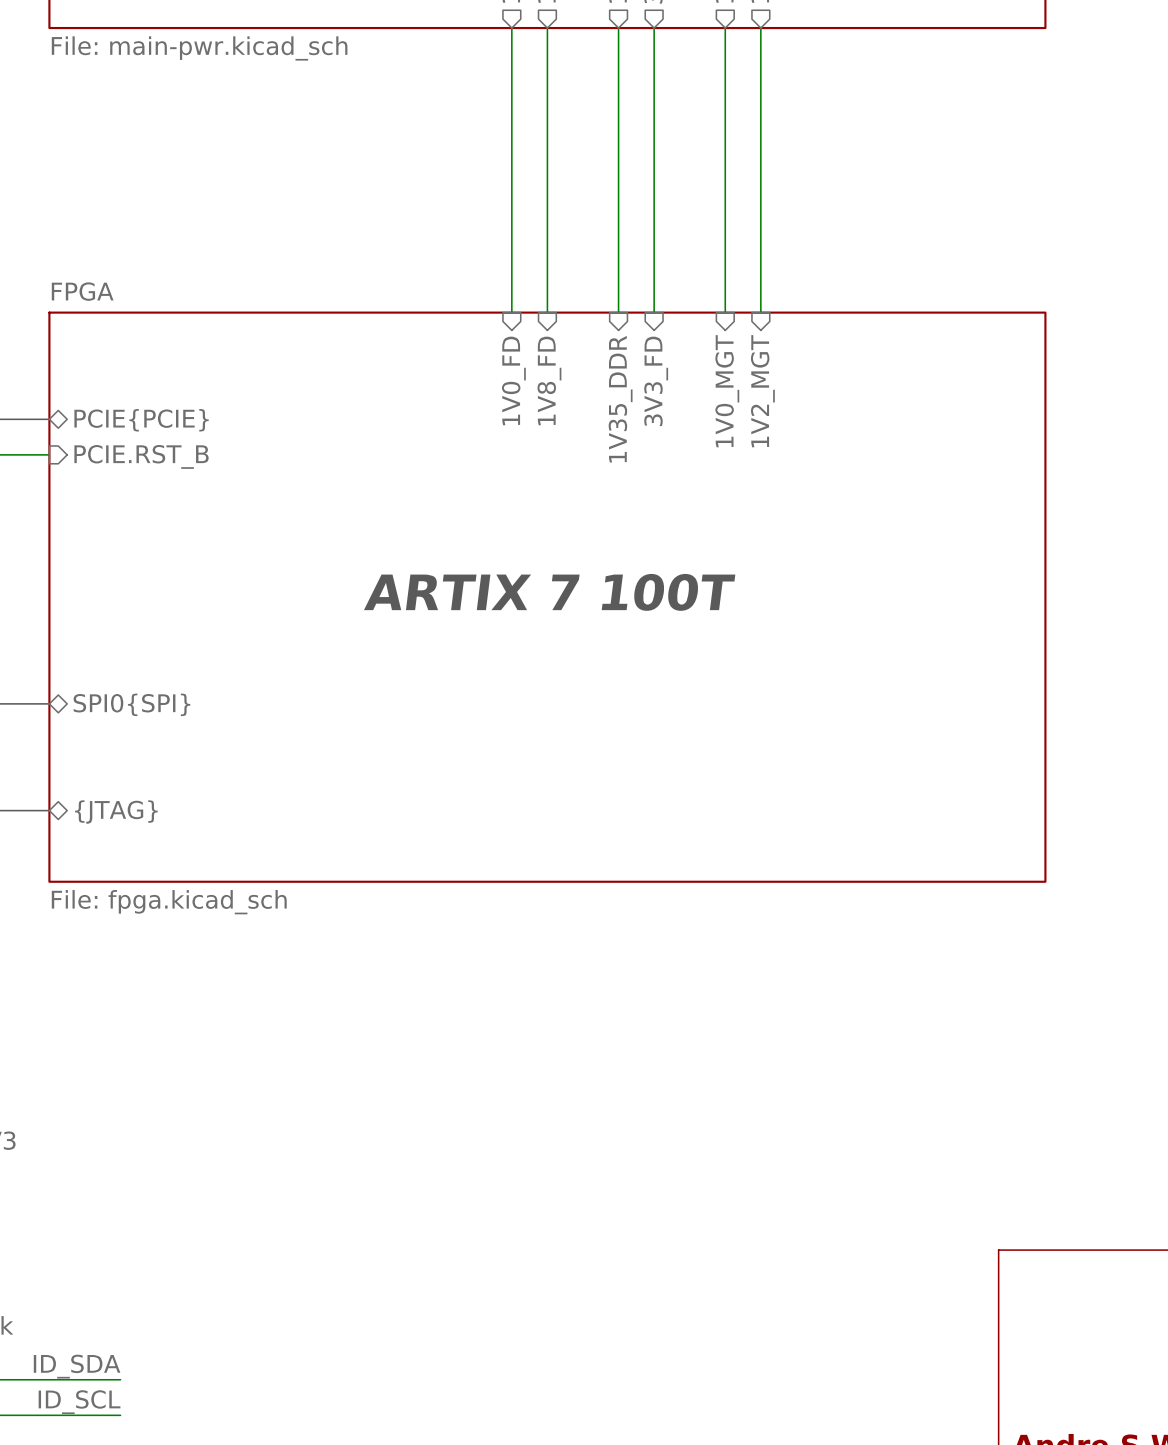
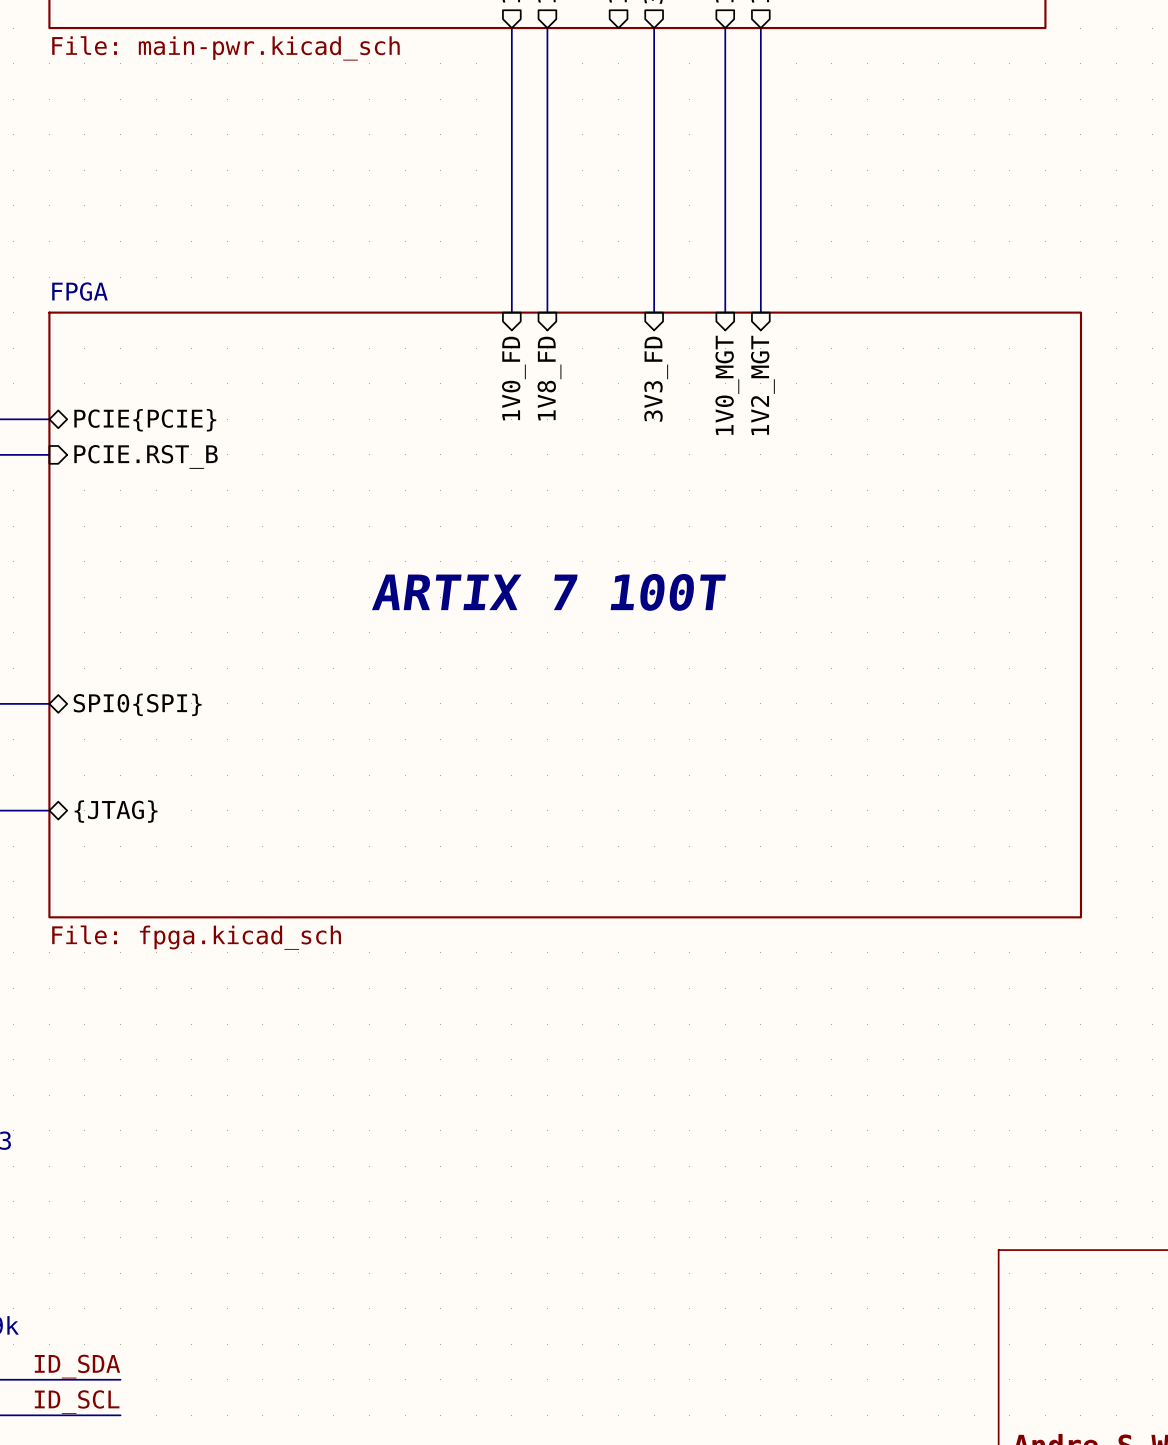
wire: (618, 28) (618, 312) -> none
sheet pin: 1V35_DDR (620, 399) -> none
sheet FPGA: File: fpga.kicad_sch (547, 597) -> none
sheet FPGA: none -> File: fpga.kicad_sch (565, 614)

